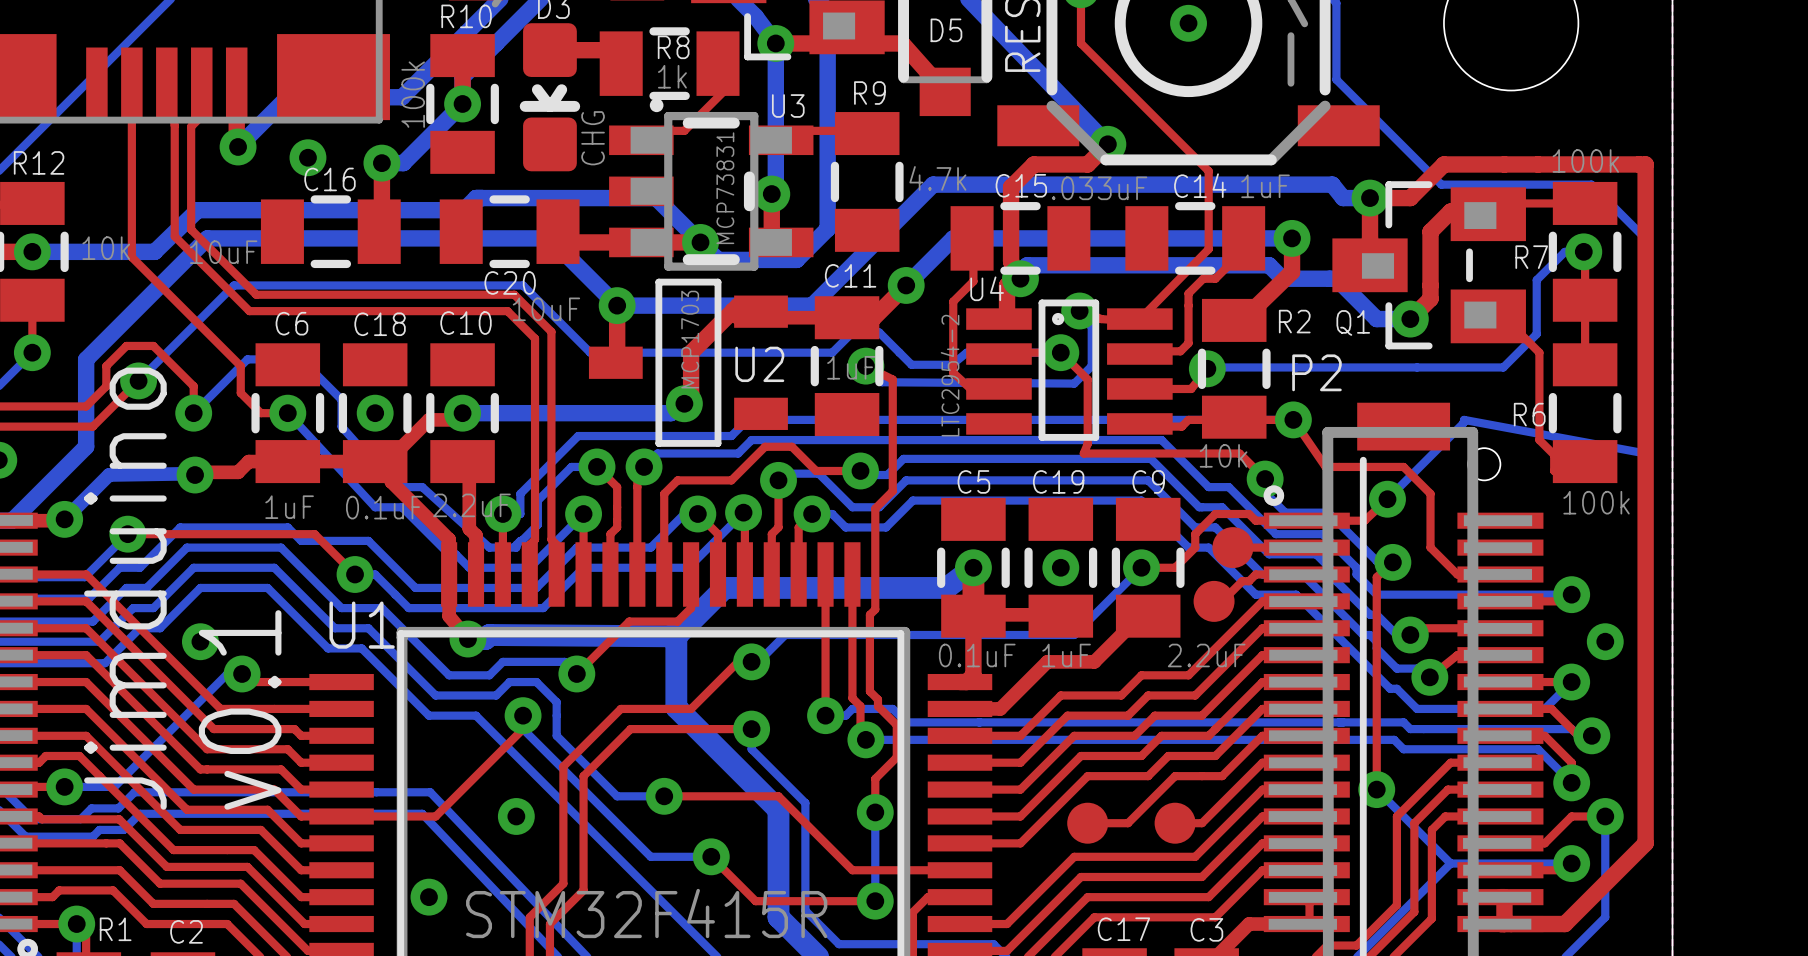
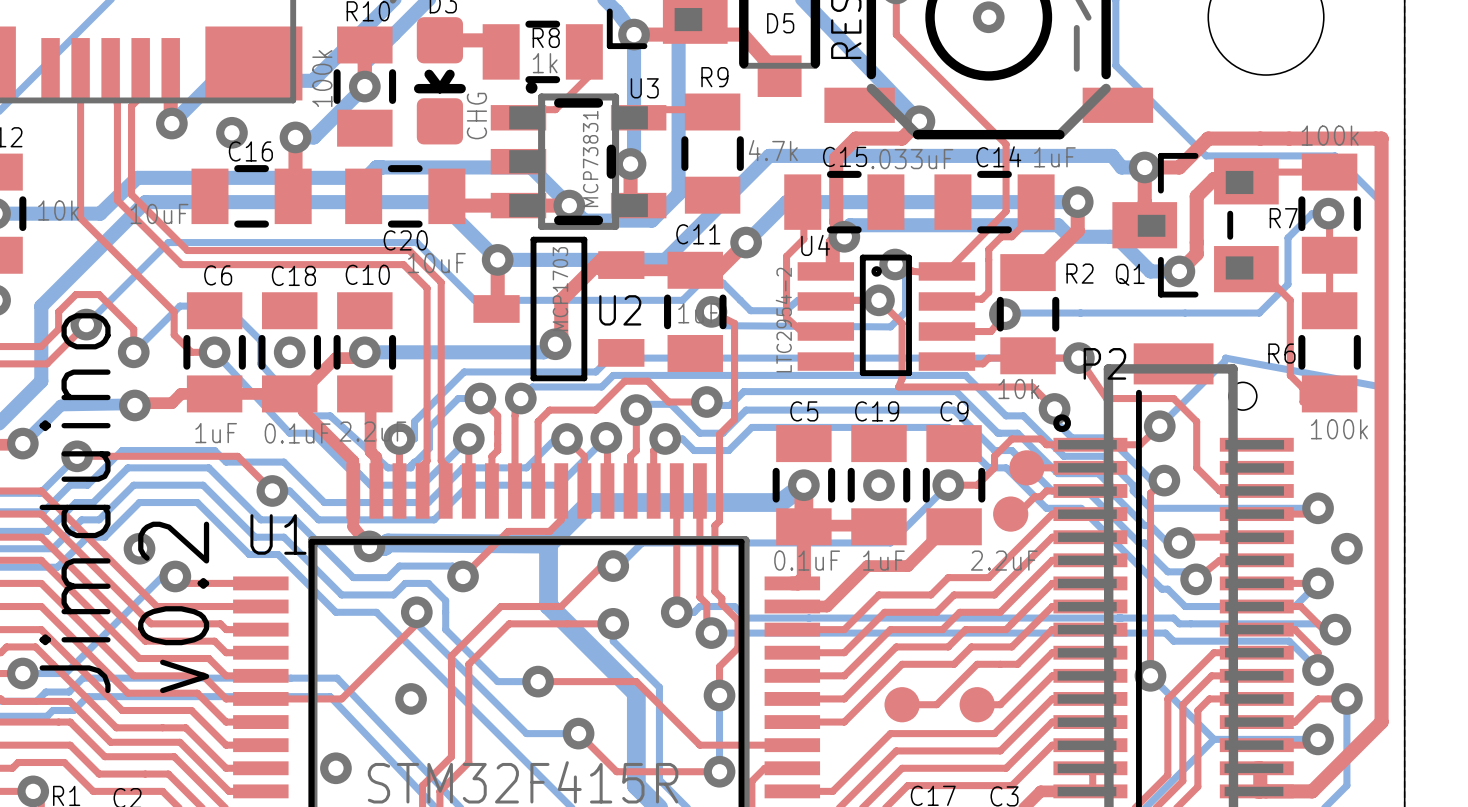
P2 name position: P2 (1316, 372) -> P2 (1104, 363)
text: v0.1 (240, 709) -> v0.2 (173, 607)

